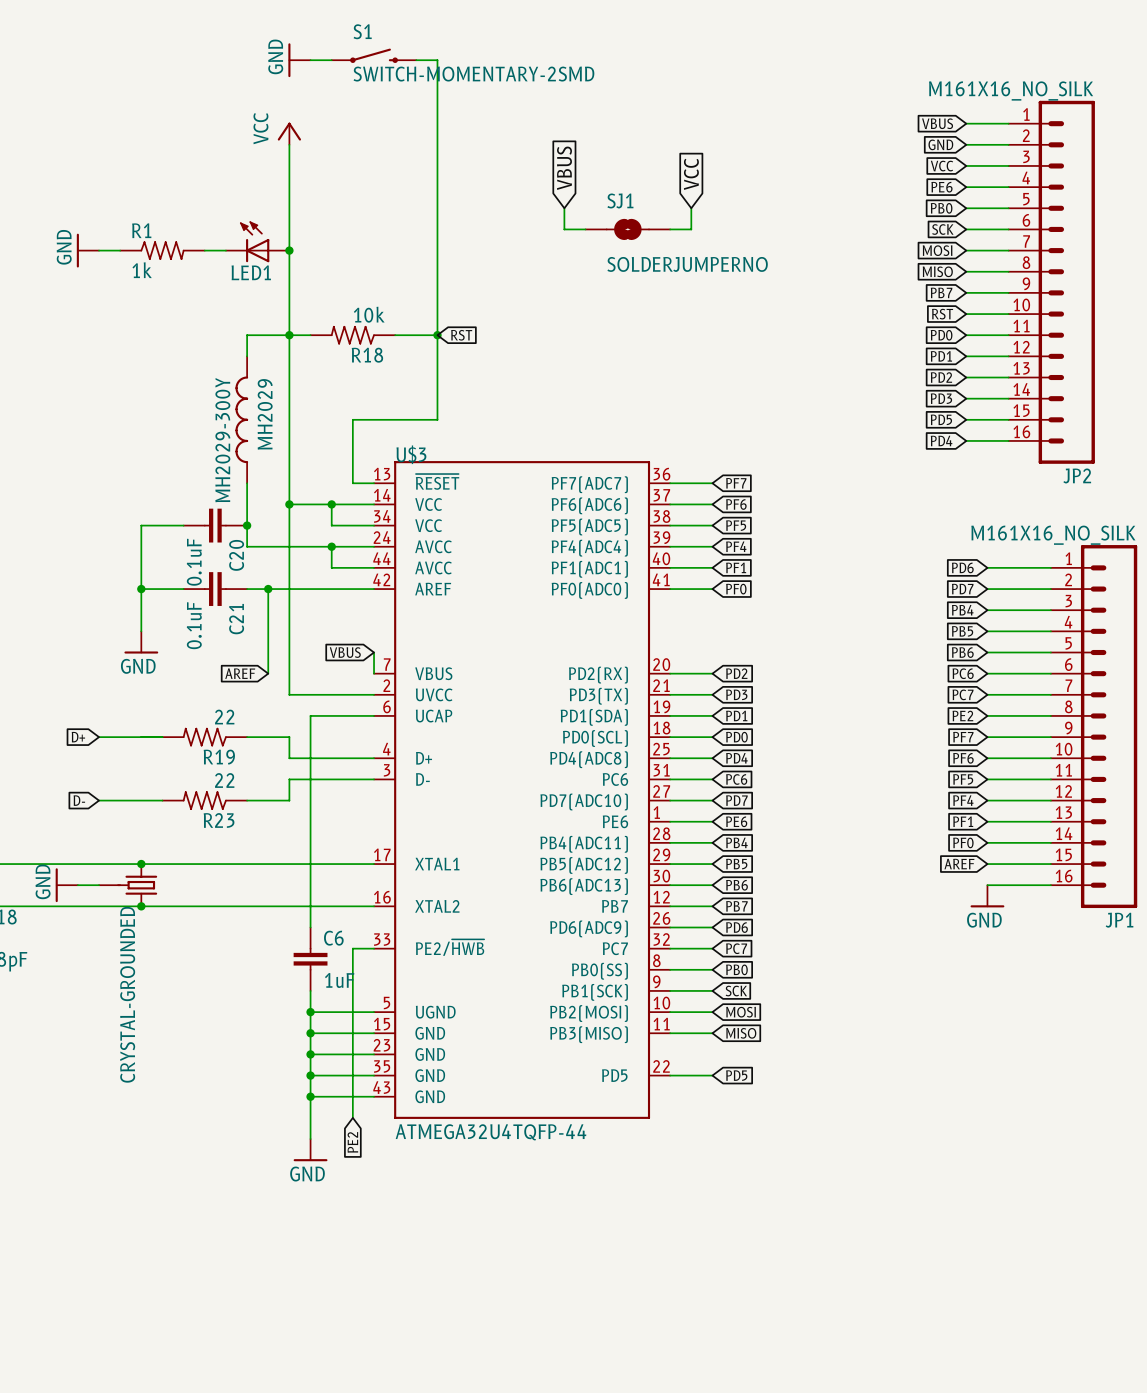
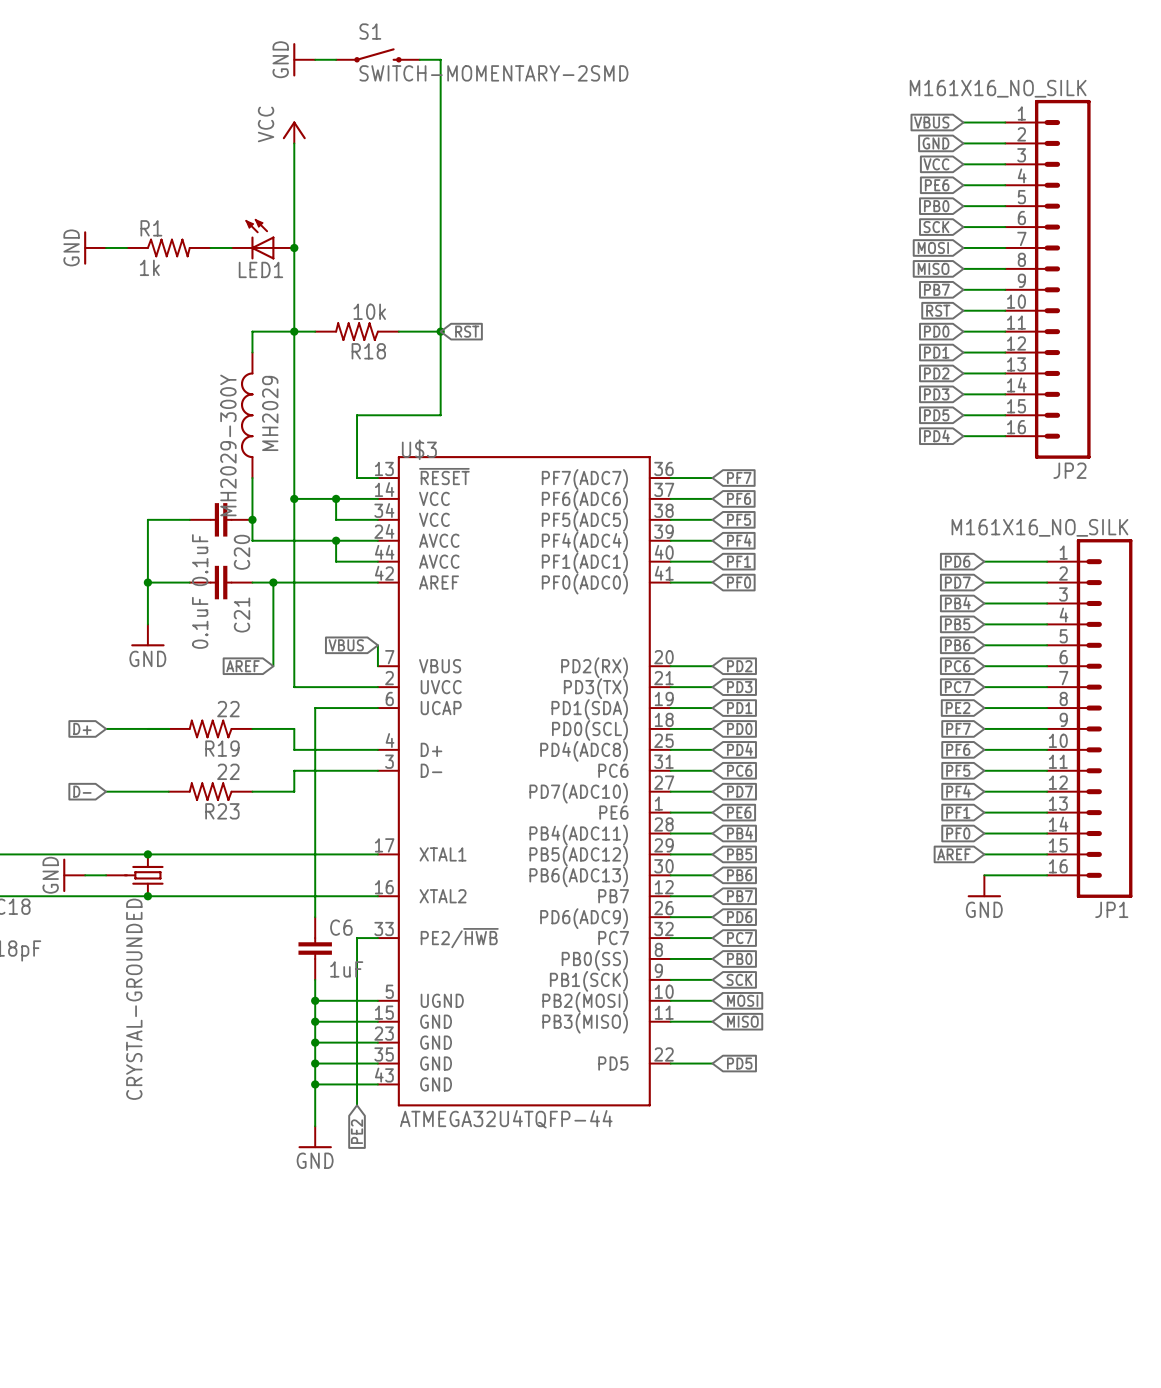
global label: VBUS (564, 168) -> none
global label: VCC (691, 174) -> none
wire: (564, 208) (564, 229) (585, 229) -> none
wire: (691, 208) (691, 229) (670, 229) -> none
SJ1: SOLDERJUMPERNO (627, 229) -> none

